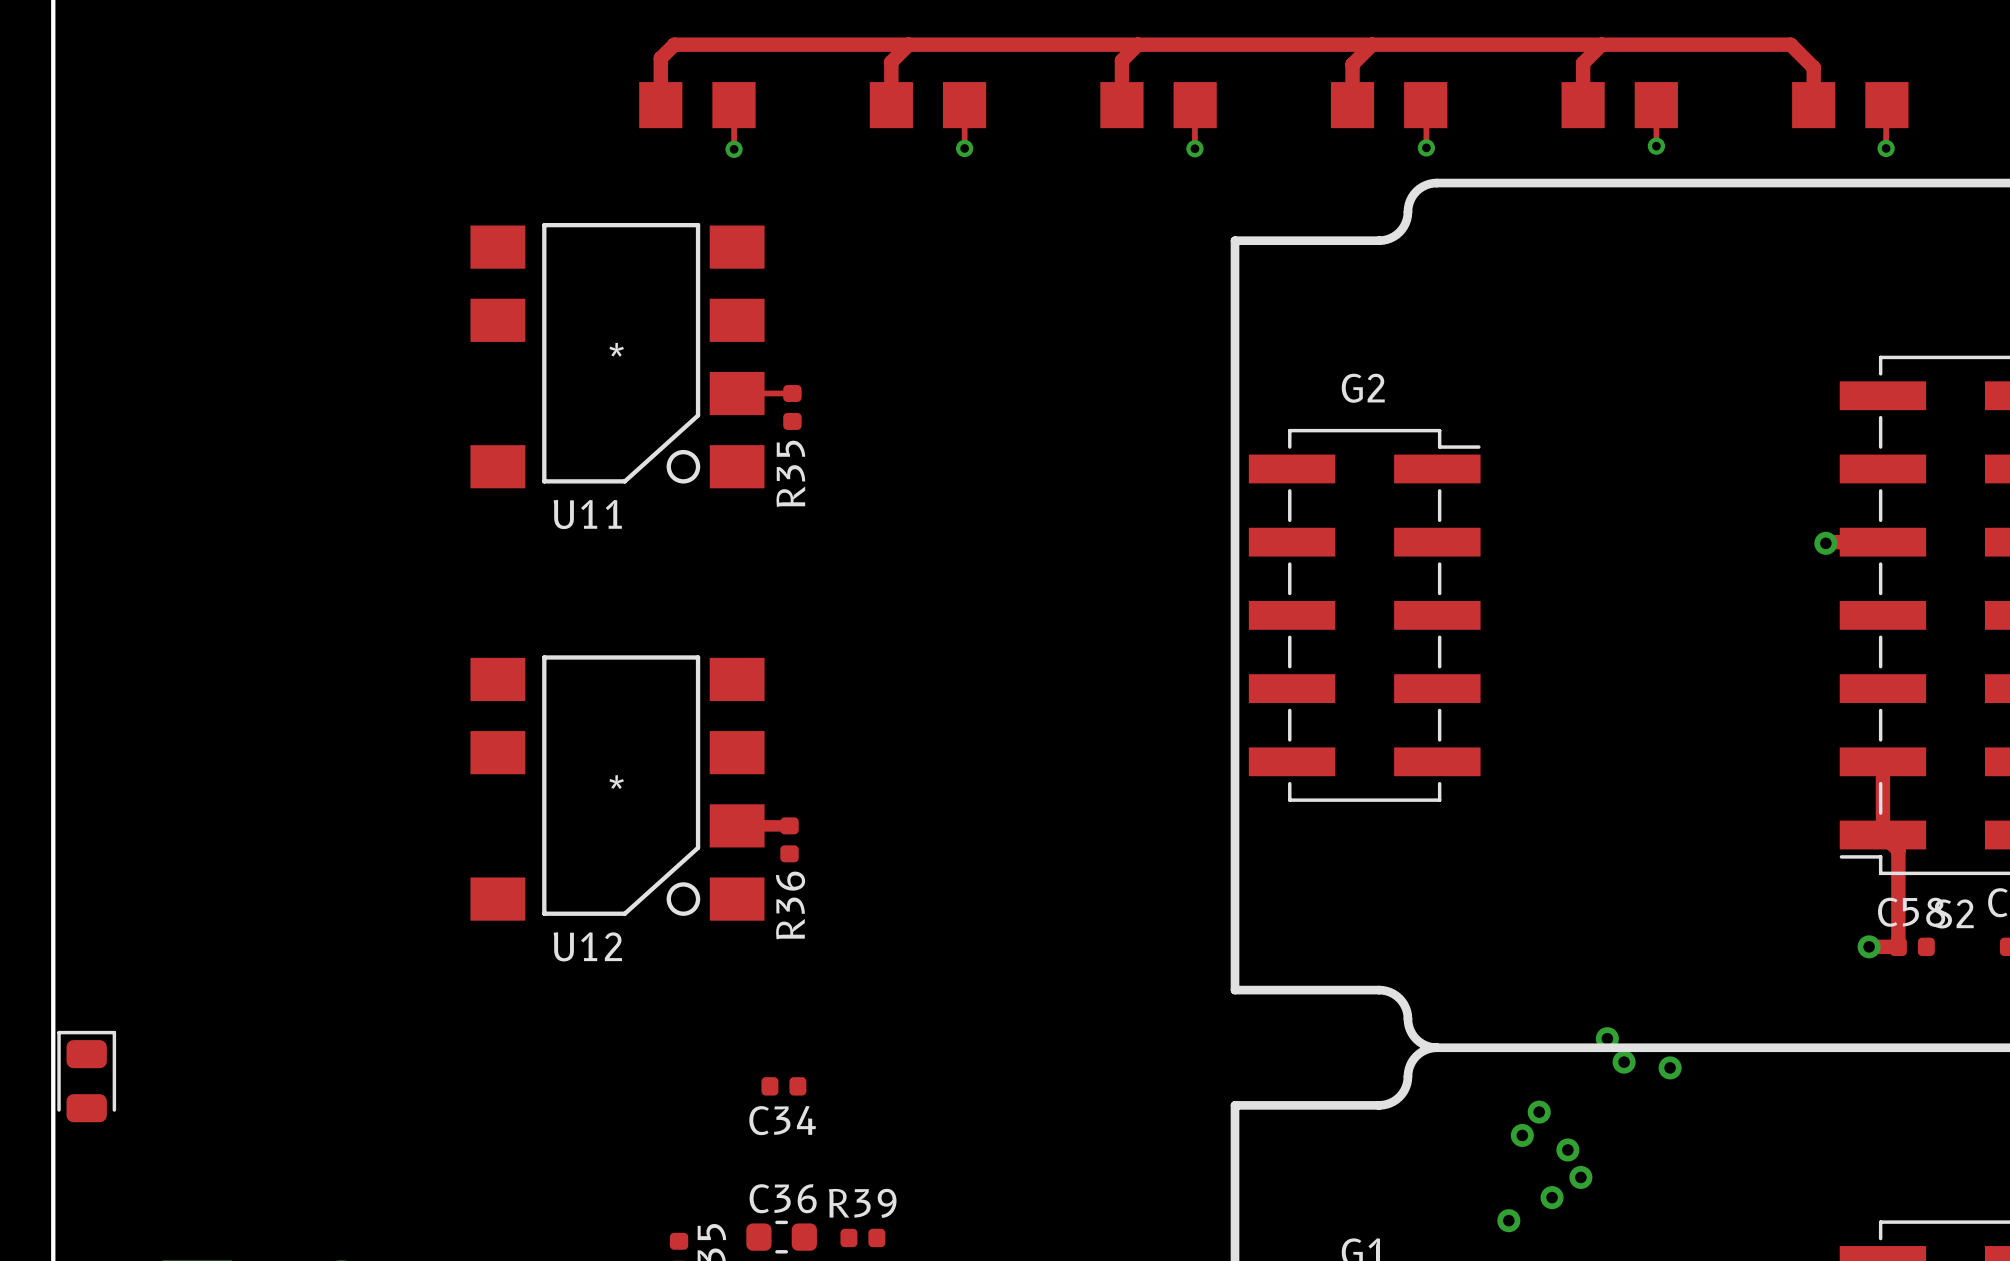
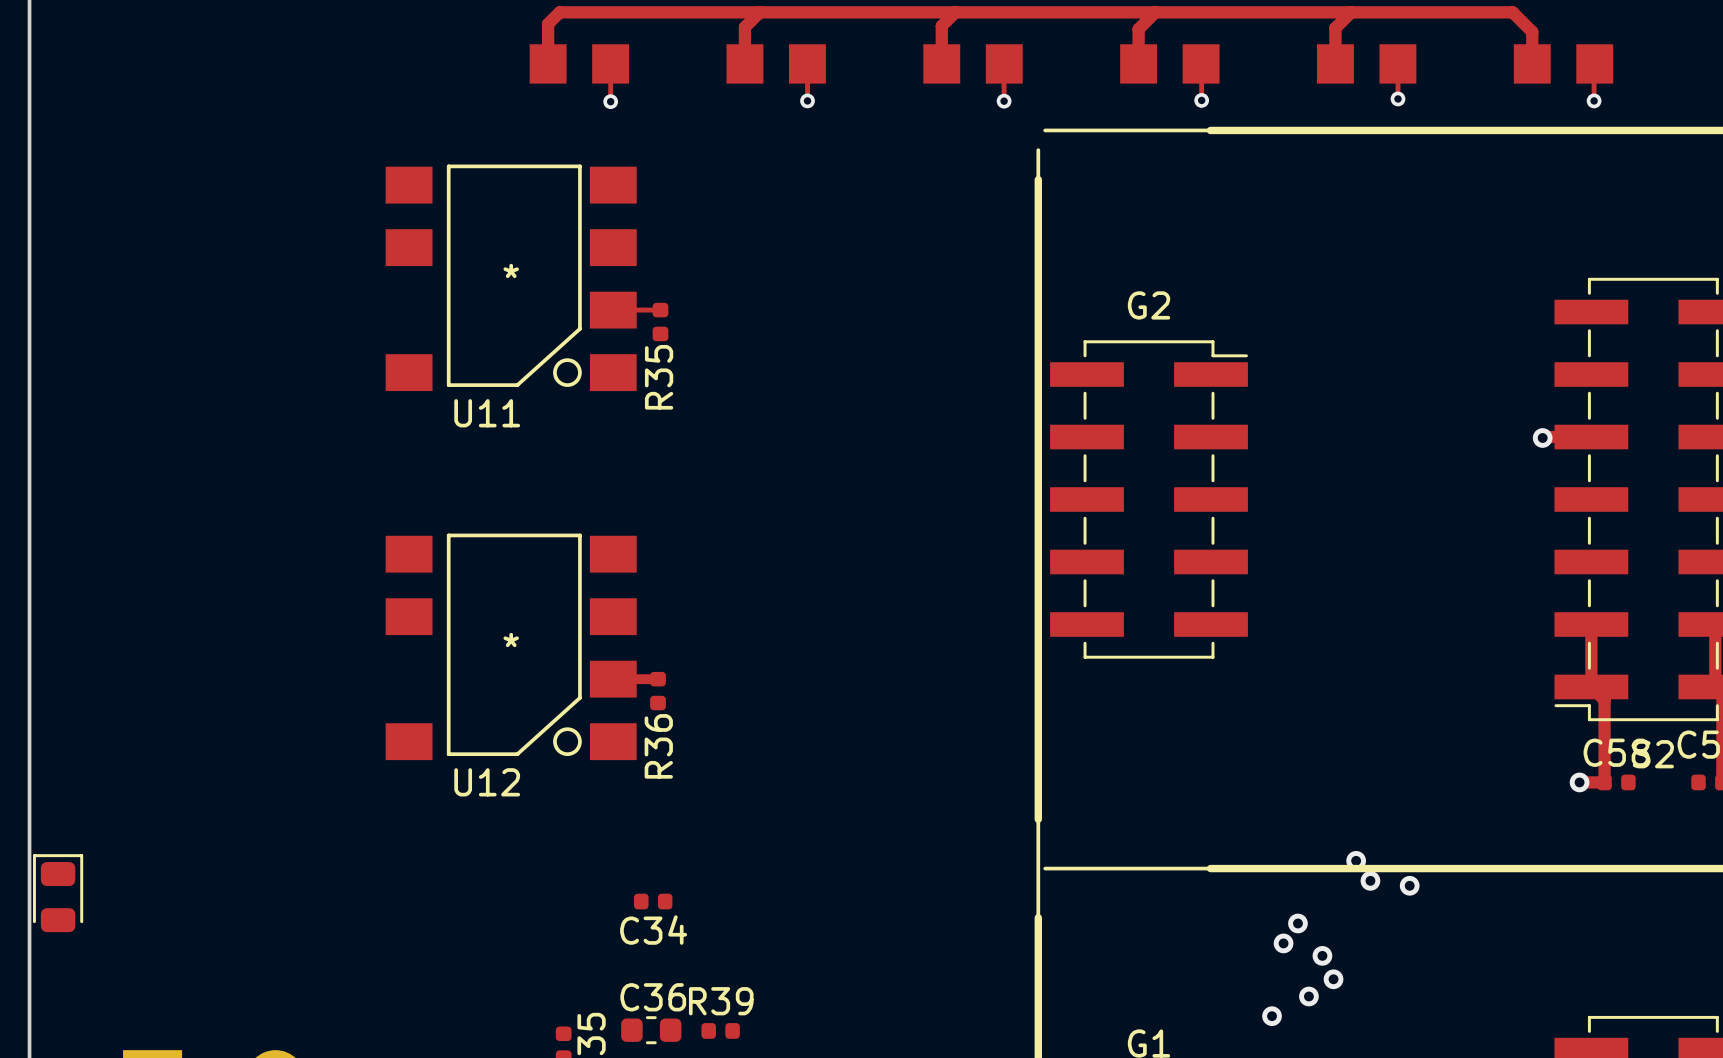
line: (1436, 183) (1425, 185) (1416, 191) (1410, 200) (1404, 226) (1396, 234) (1386, 239) (1235, 240) -> (1210, 130) (1045, 130)
line: none -> (1038, 150) (1038, 179)
line: (1235, 990) (1386, 991) (1396, 996) (1404, 1004) (1410, 1029) (1416, 1039) (1425, 1045) (1436, 1047) (1425, 1049) (1416, 1056) (1410, 1065) (1404, 1090) (1396, 1099) (1386, 1104) (1235, 1105) -> (1038, 819) (1038, 917)
line: none -> (1045, 868) (1210, 868)

